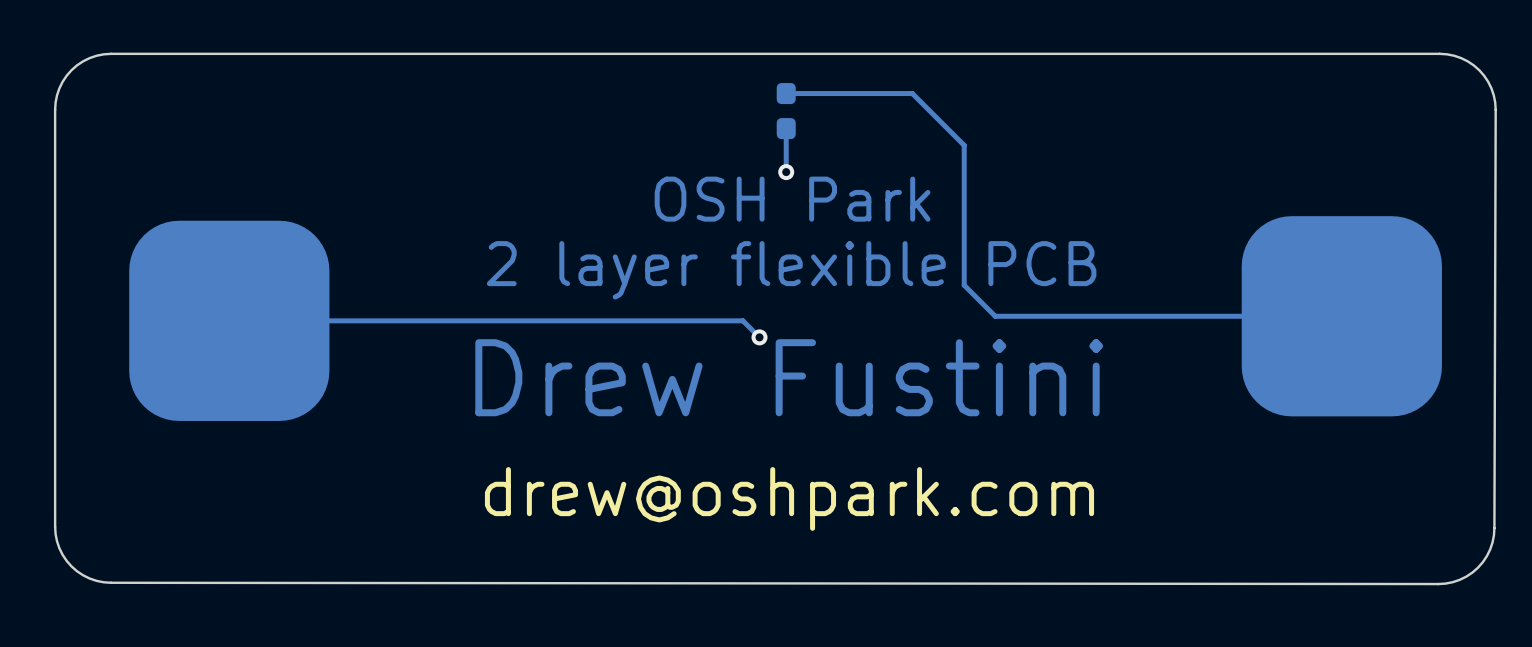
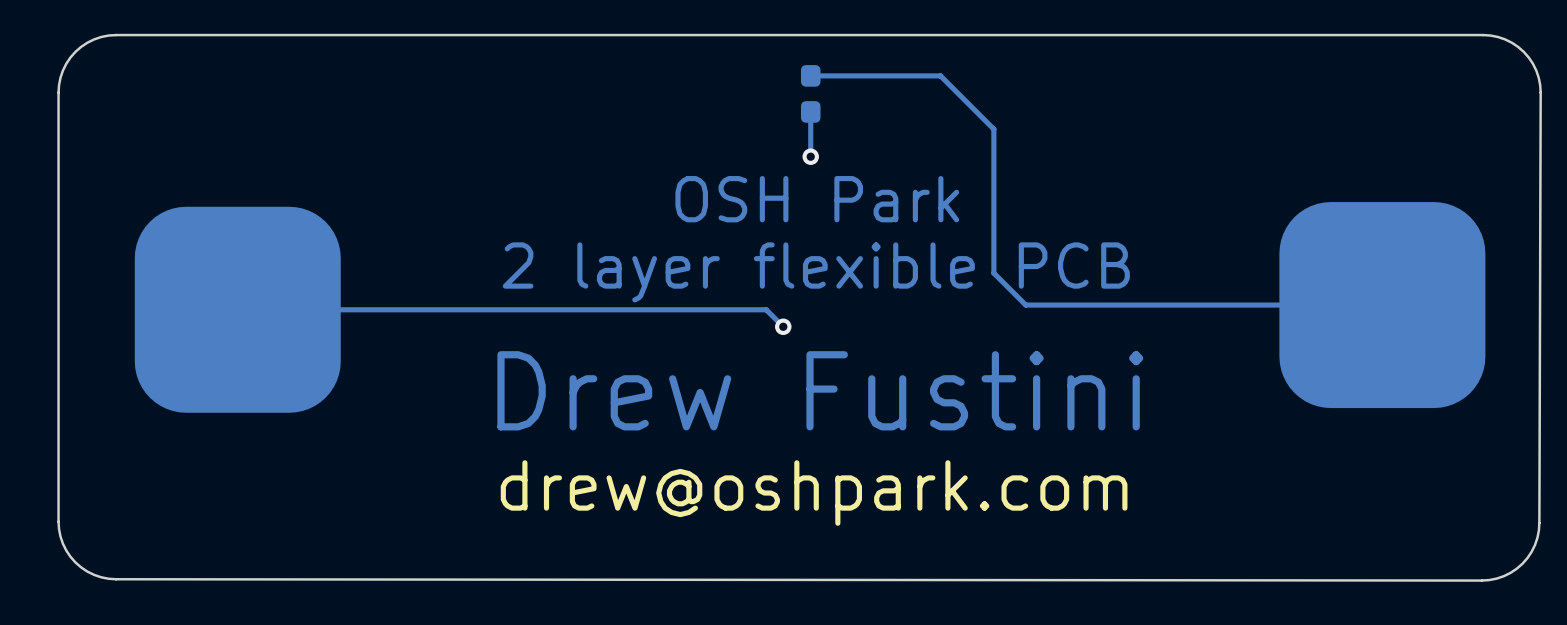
text position: OSH Park (792, 199) -> OSH Park (817, 199)
text position: 2 layer flexible PCB (791, 270) -> 2 layer flexible PCB (816, 272)
text position: Drew Fustini (789, 377) -> Drew Fustini (820, 390)

